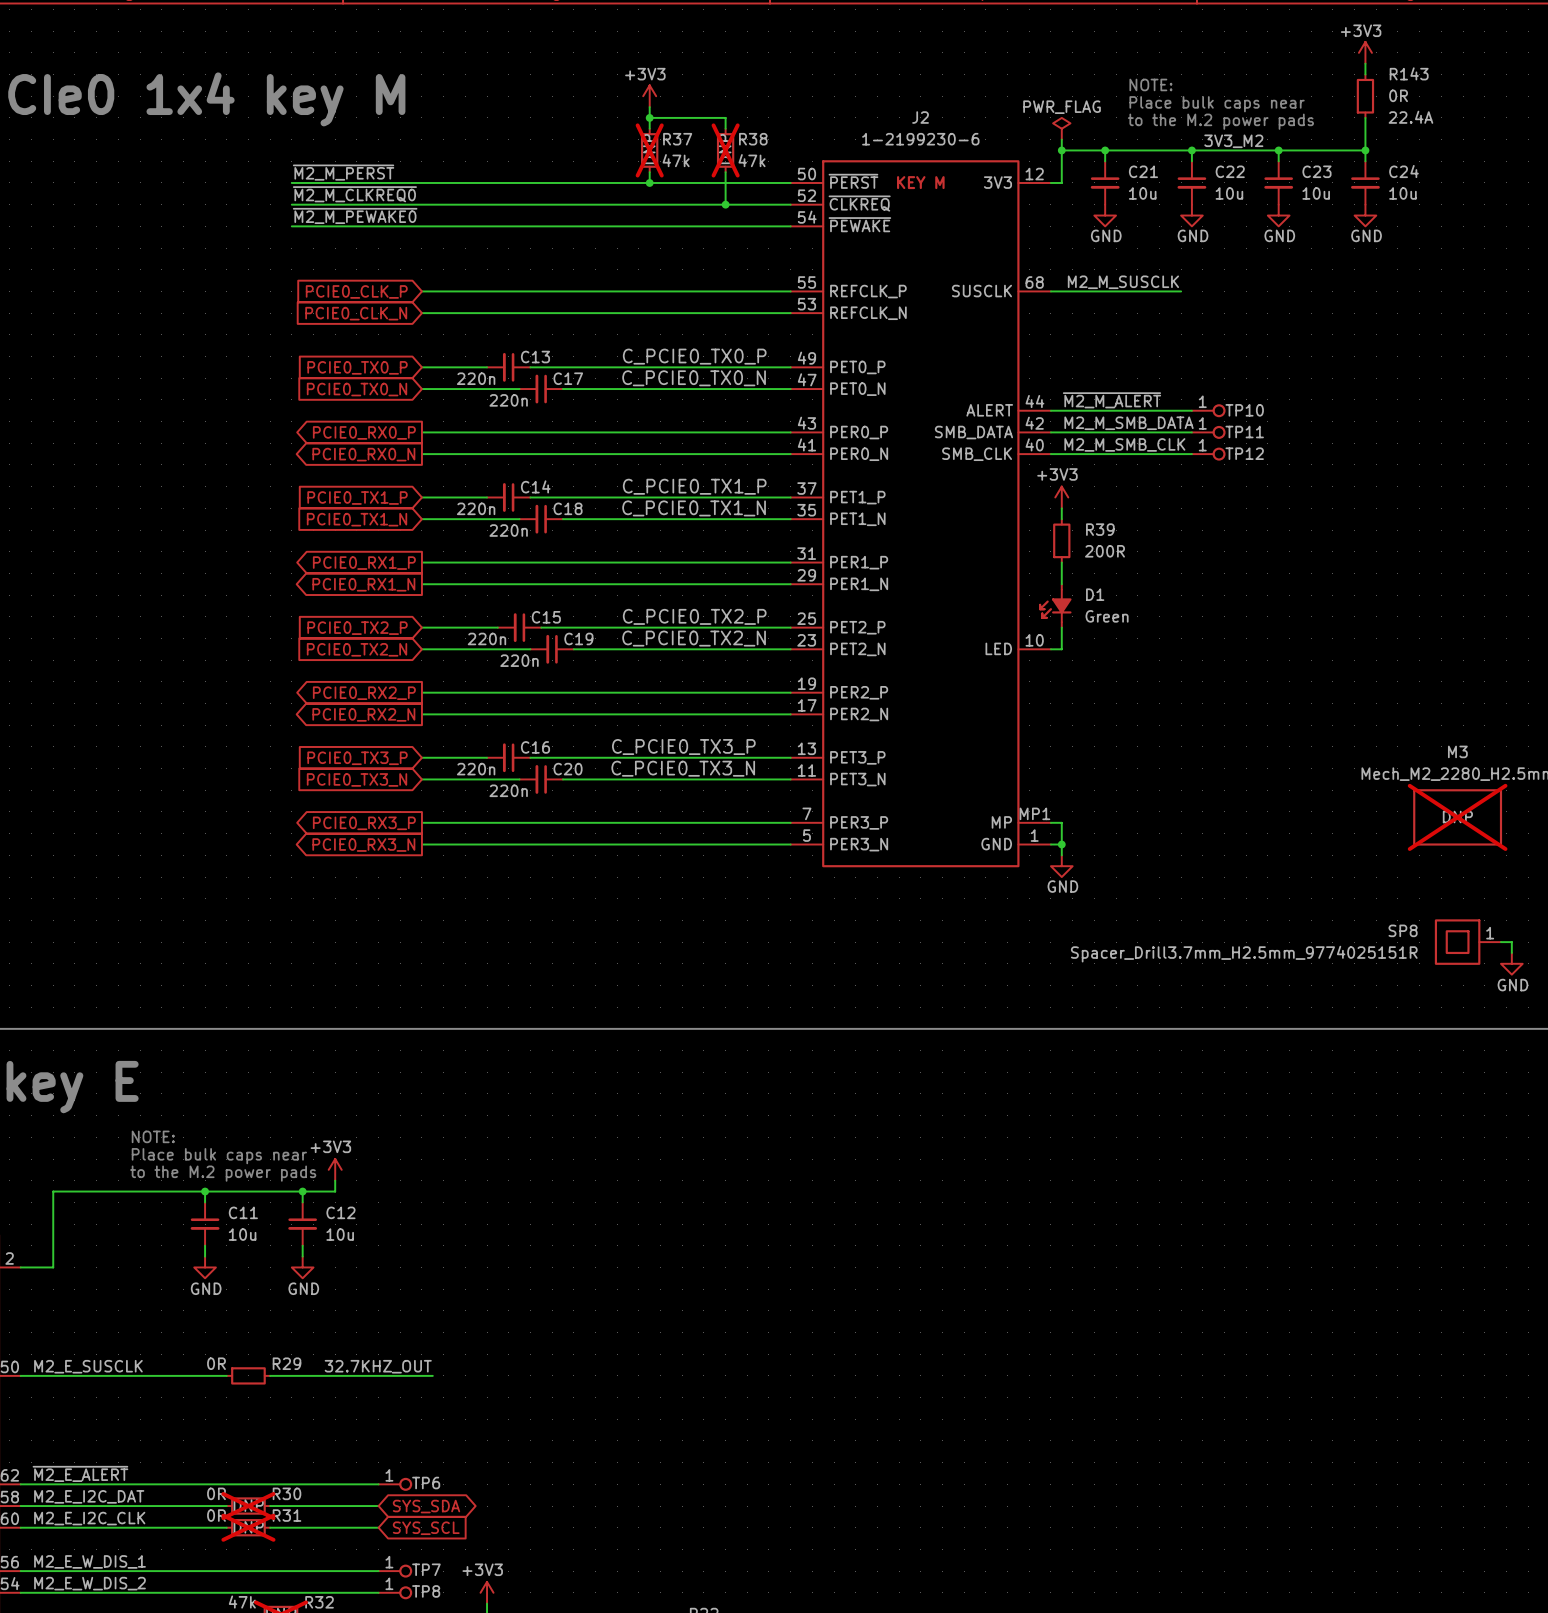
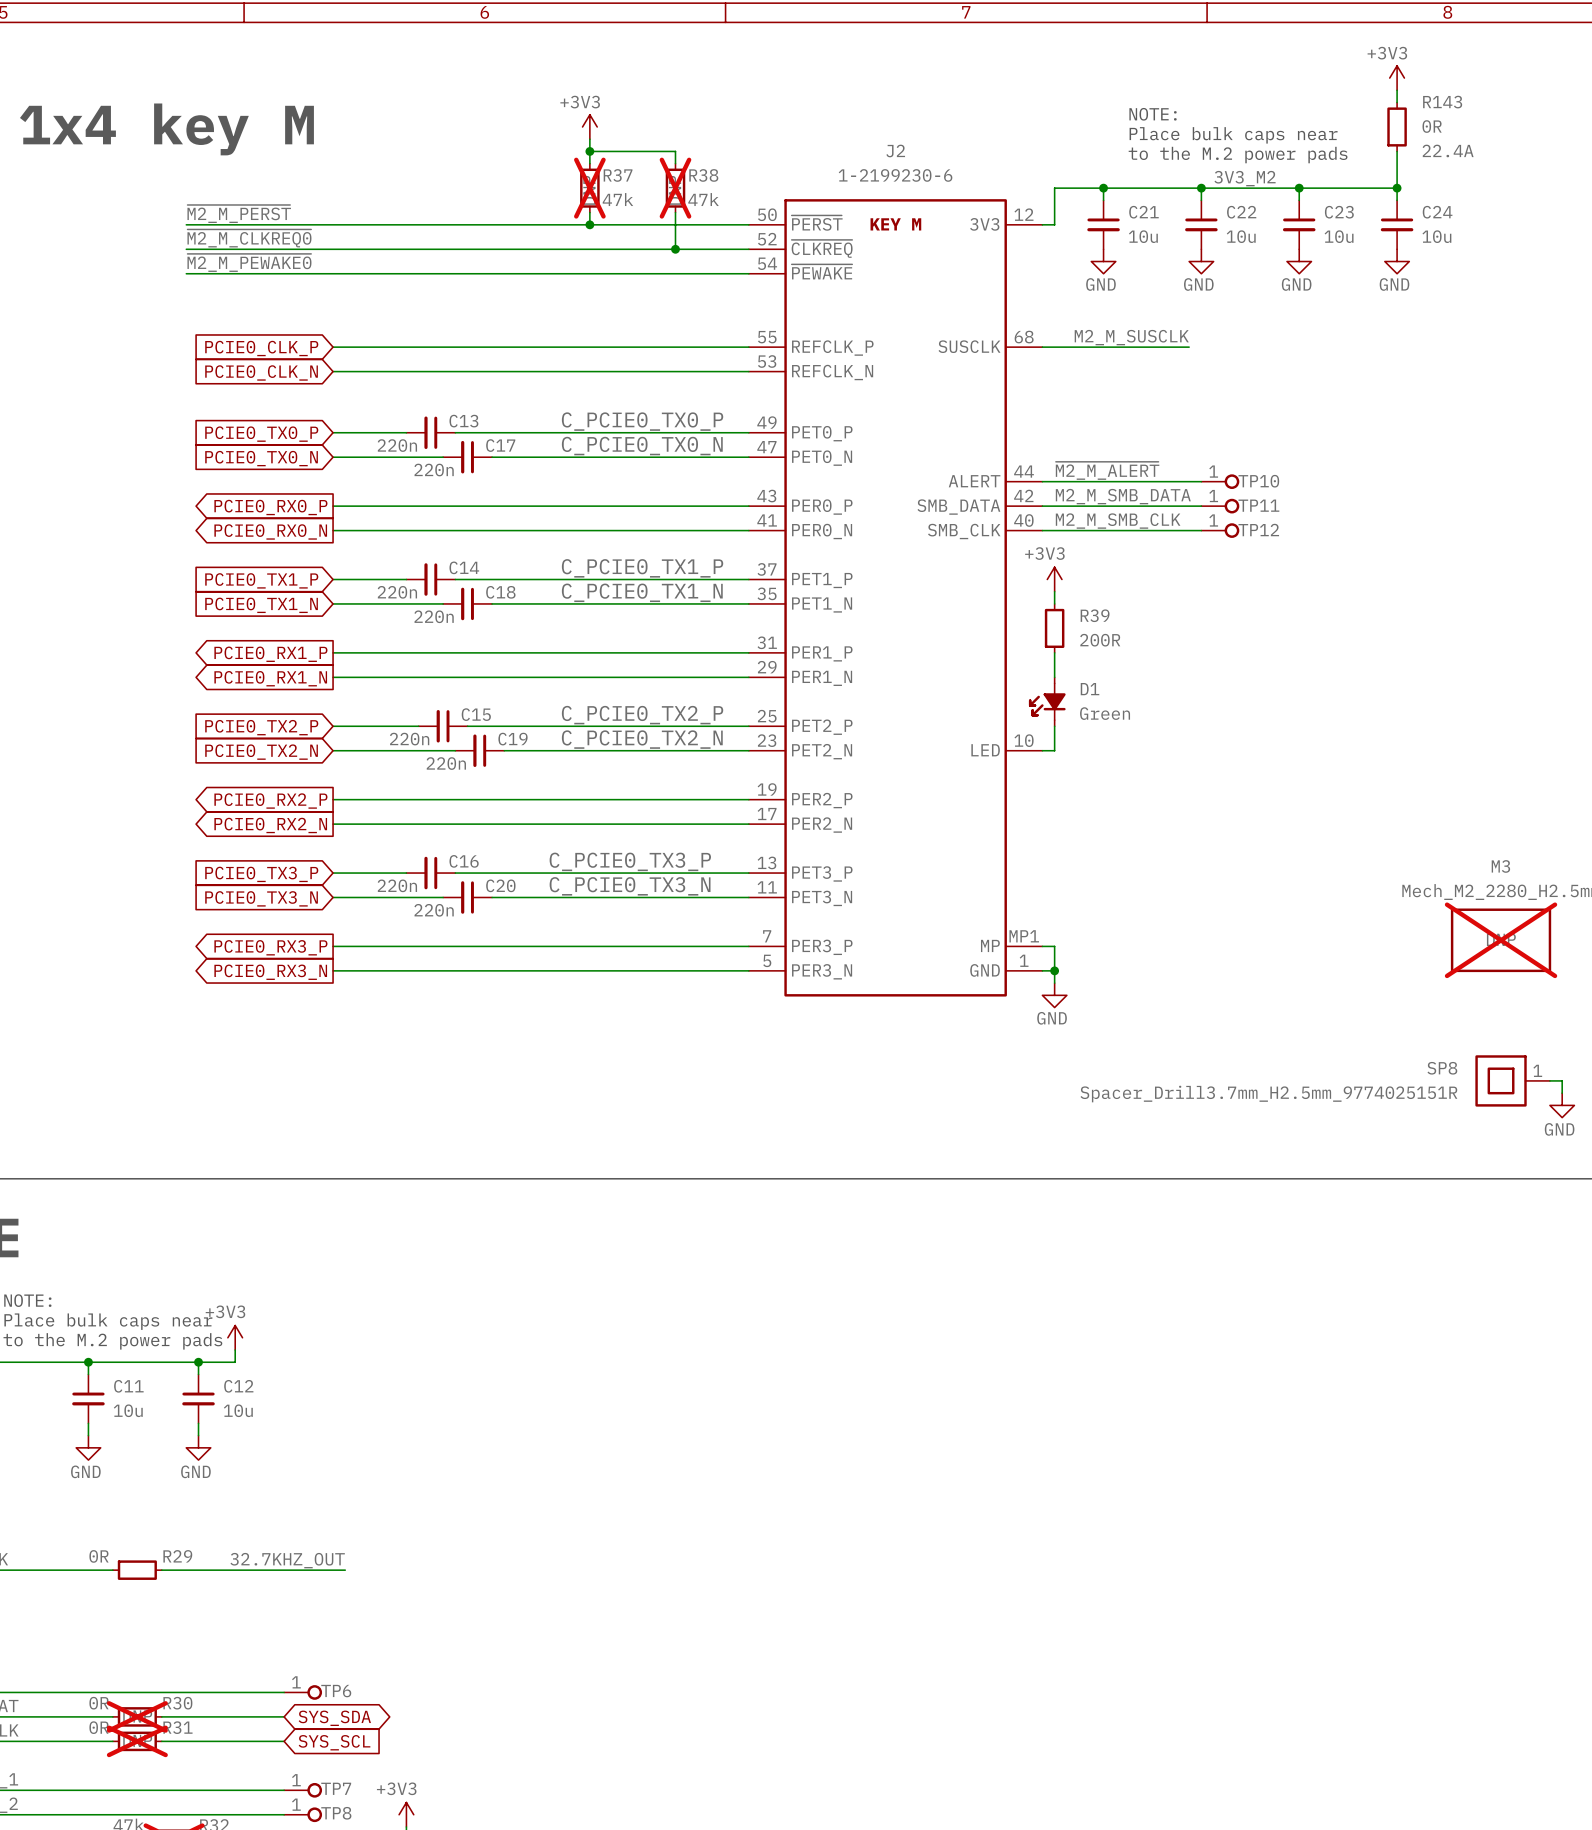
power symbol: PWR_FLAG (1061, 128) -> none
wire: (1061, 139) (1061, 150) -> none
junction: (1061, 150) -> none

